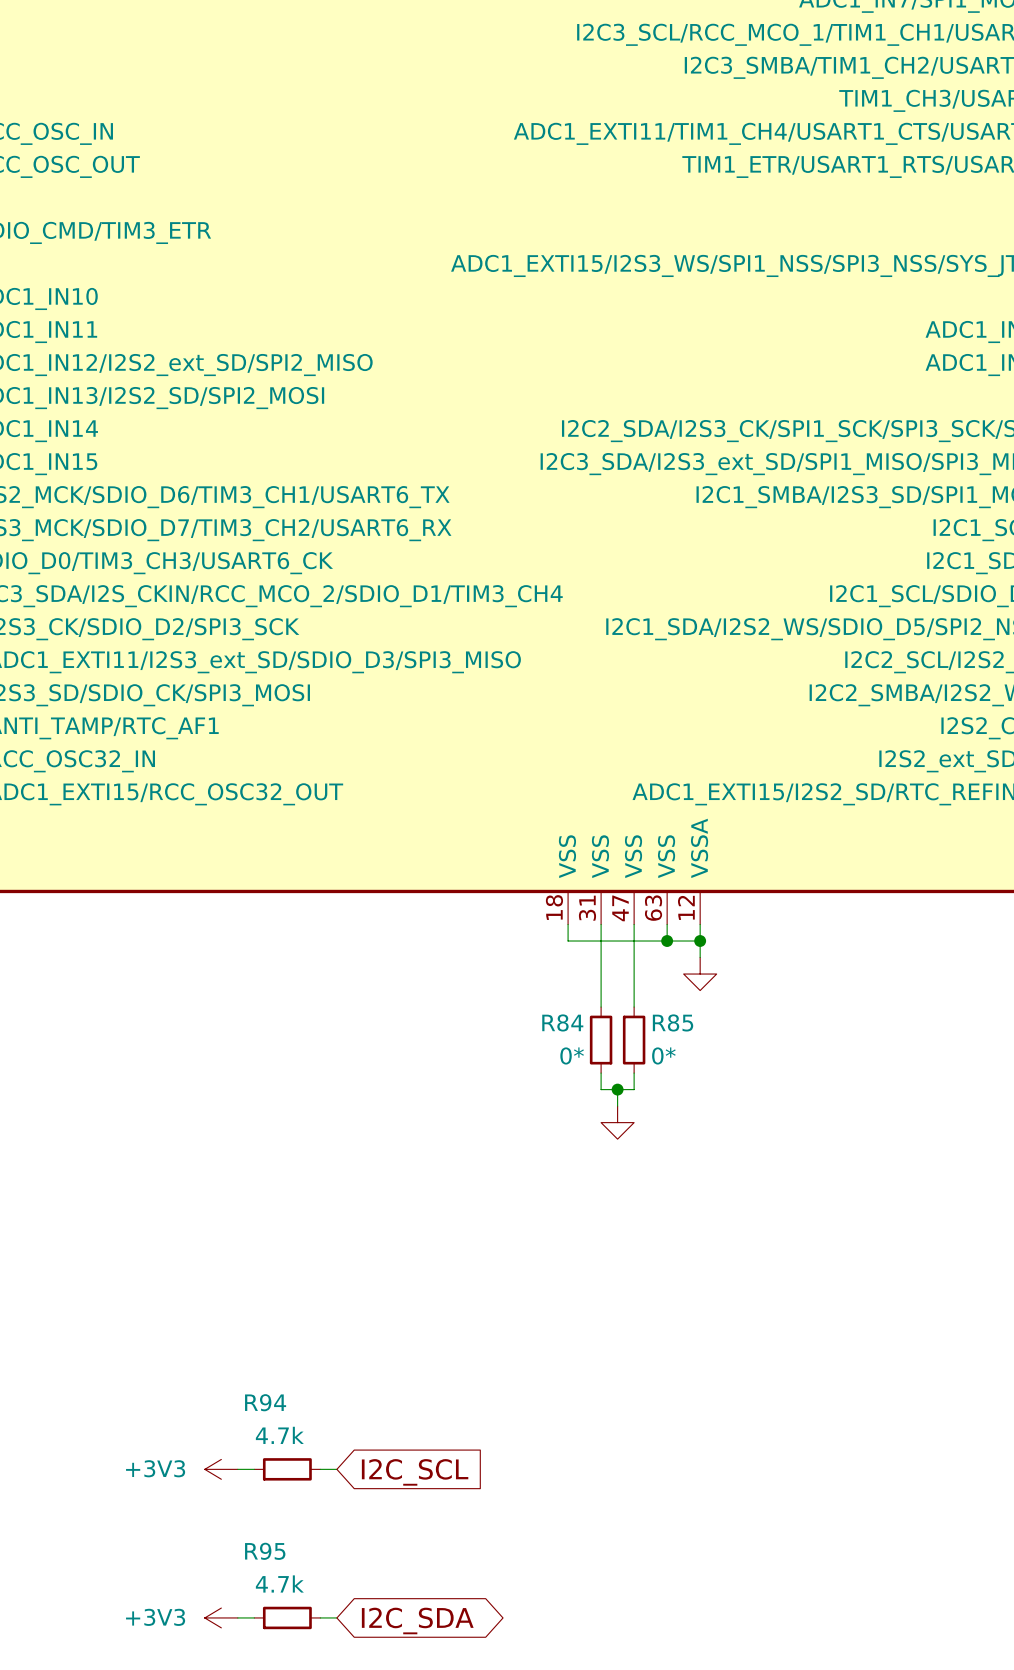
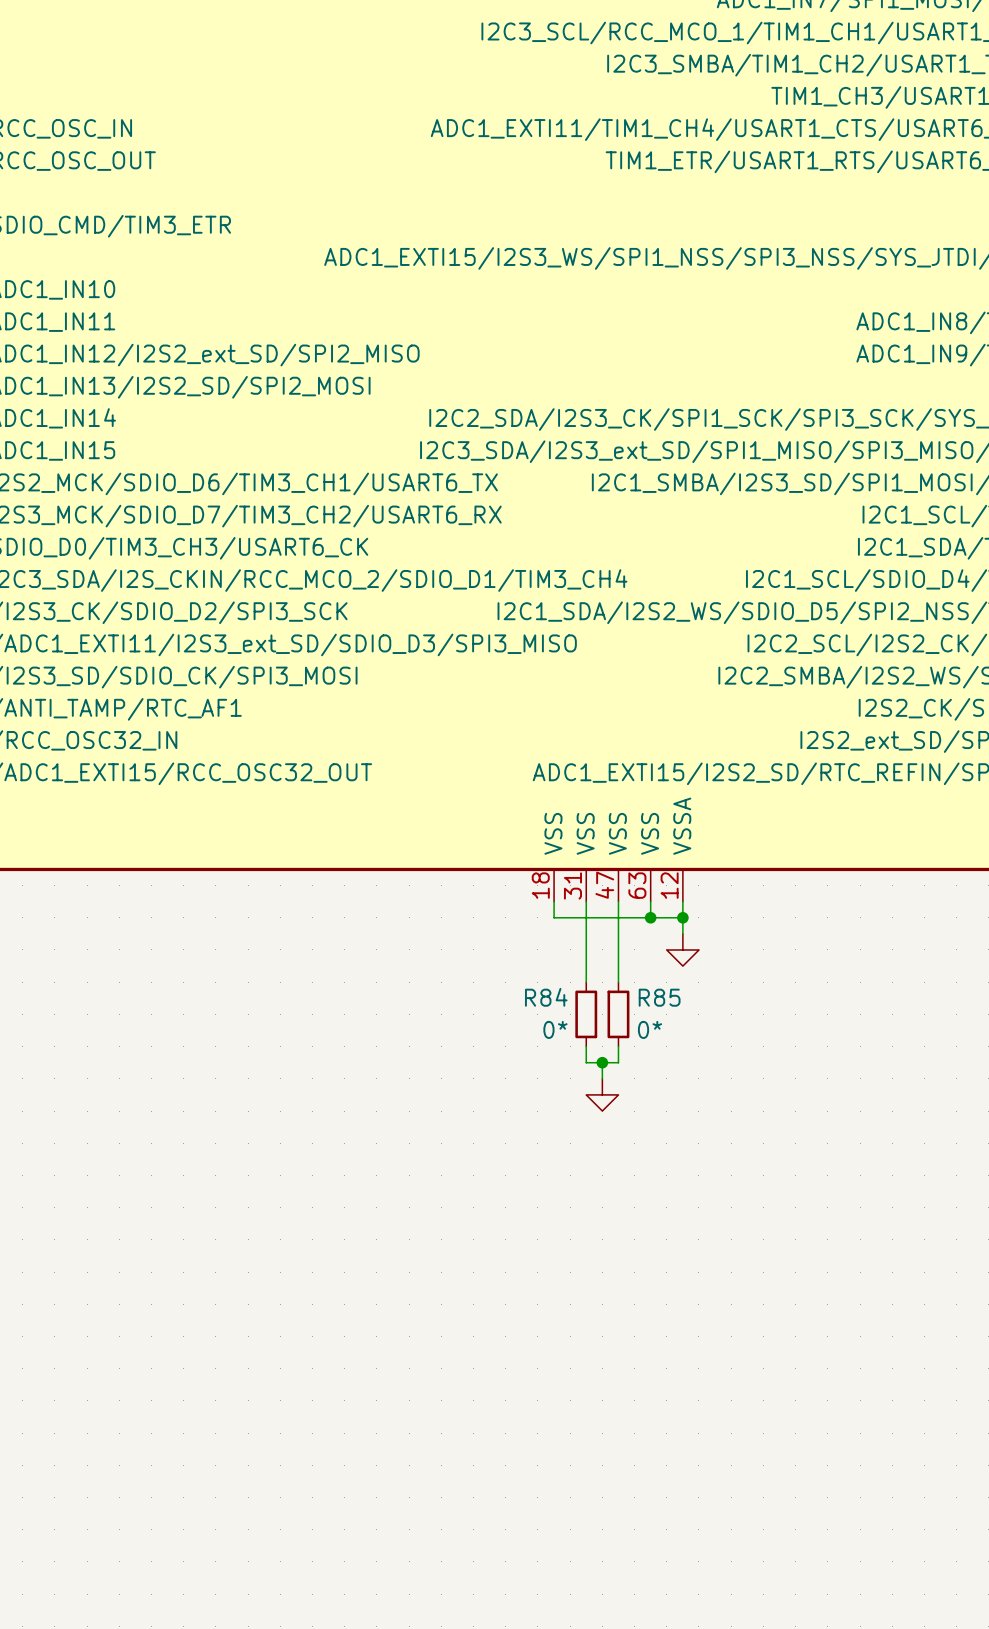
power symbol: +3V3 (221, 1469) -> none
wire: (237, 1469) (254, 1469) -> none
R94: 4.7k (287, 1469) -> none
wire: (320, 1469) (336, 1469) -> none
global label: I2C_SCL (415, 1472) -> none
power symbol: +3V3 (221, 1617) -> none
wire: (237, 1617) (254, 1617) -> none
R95: 4.7k (287, 1617) -> none
wire: (320, 1617) (336, 1617) -> none
global label: I2C_SDA (417, 1620) -> none

